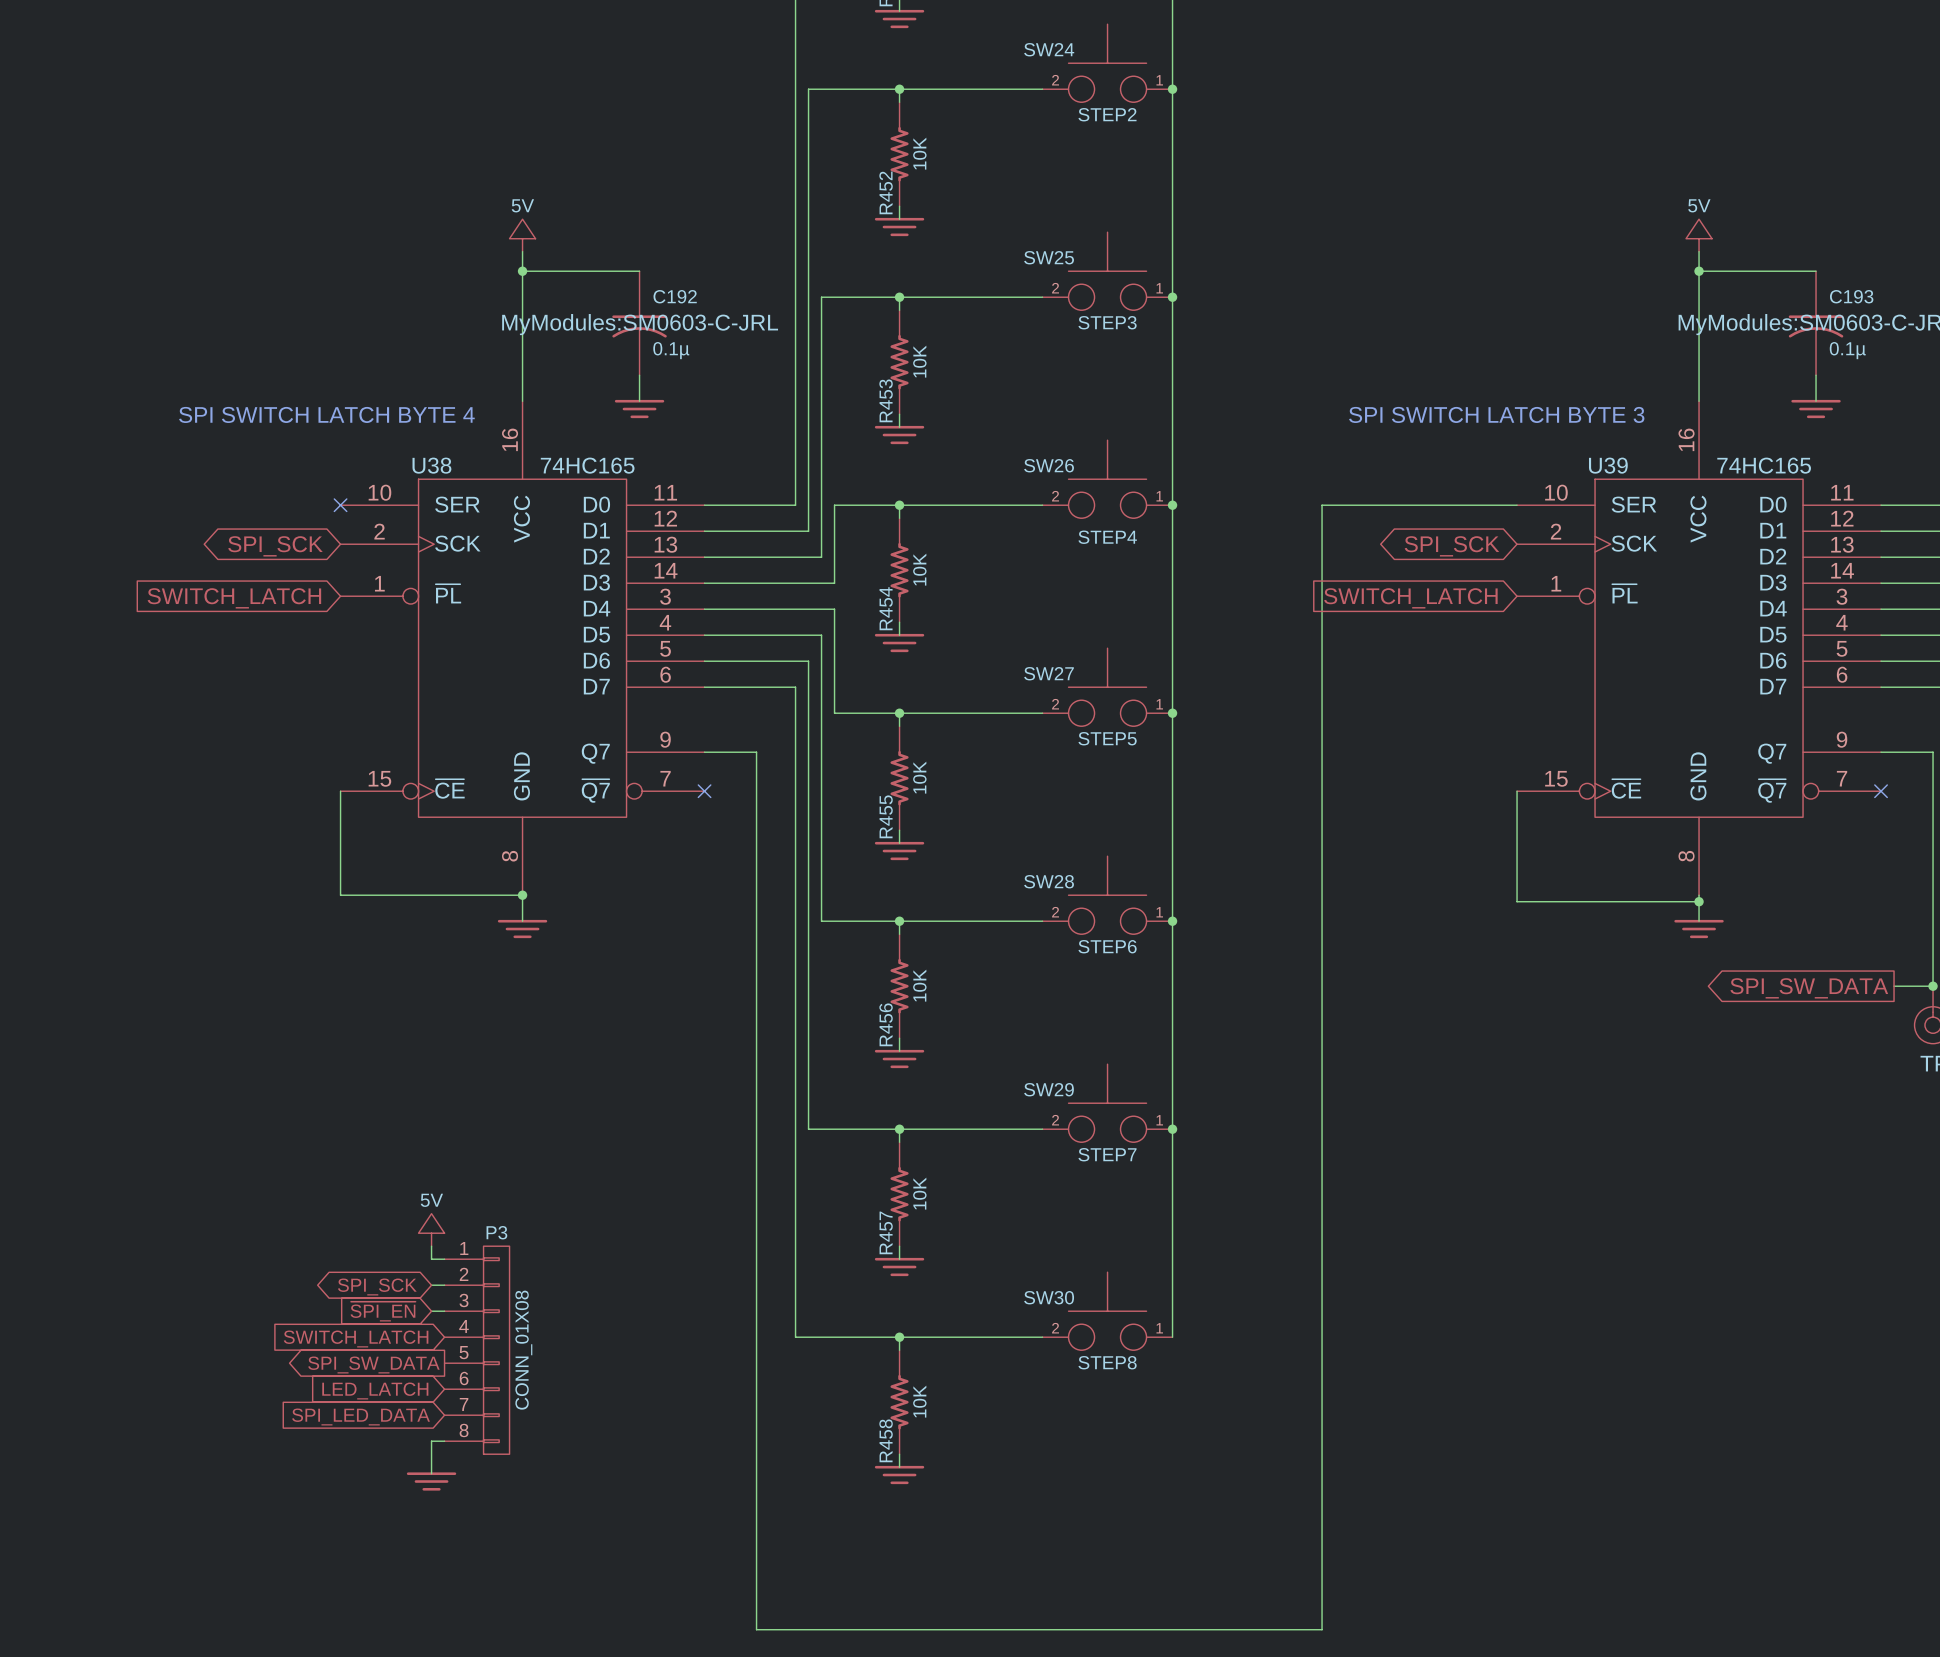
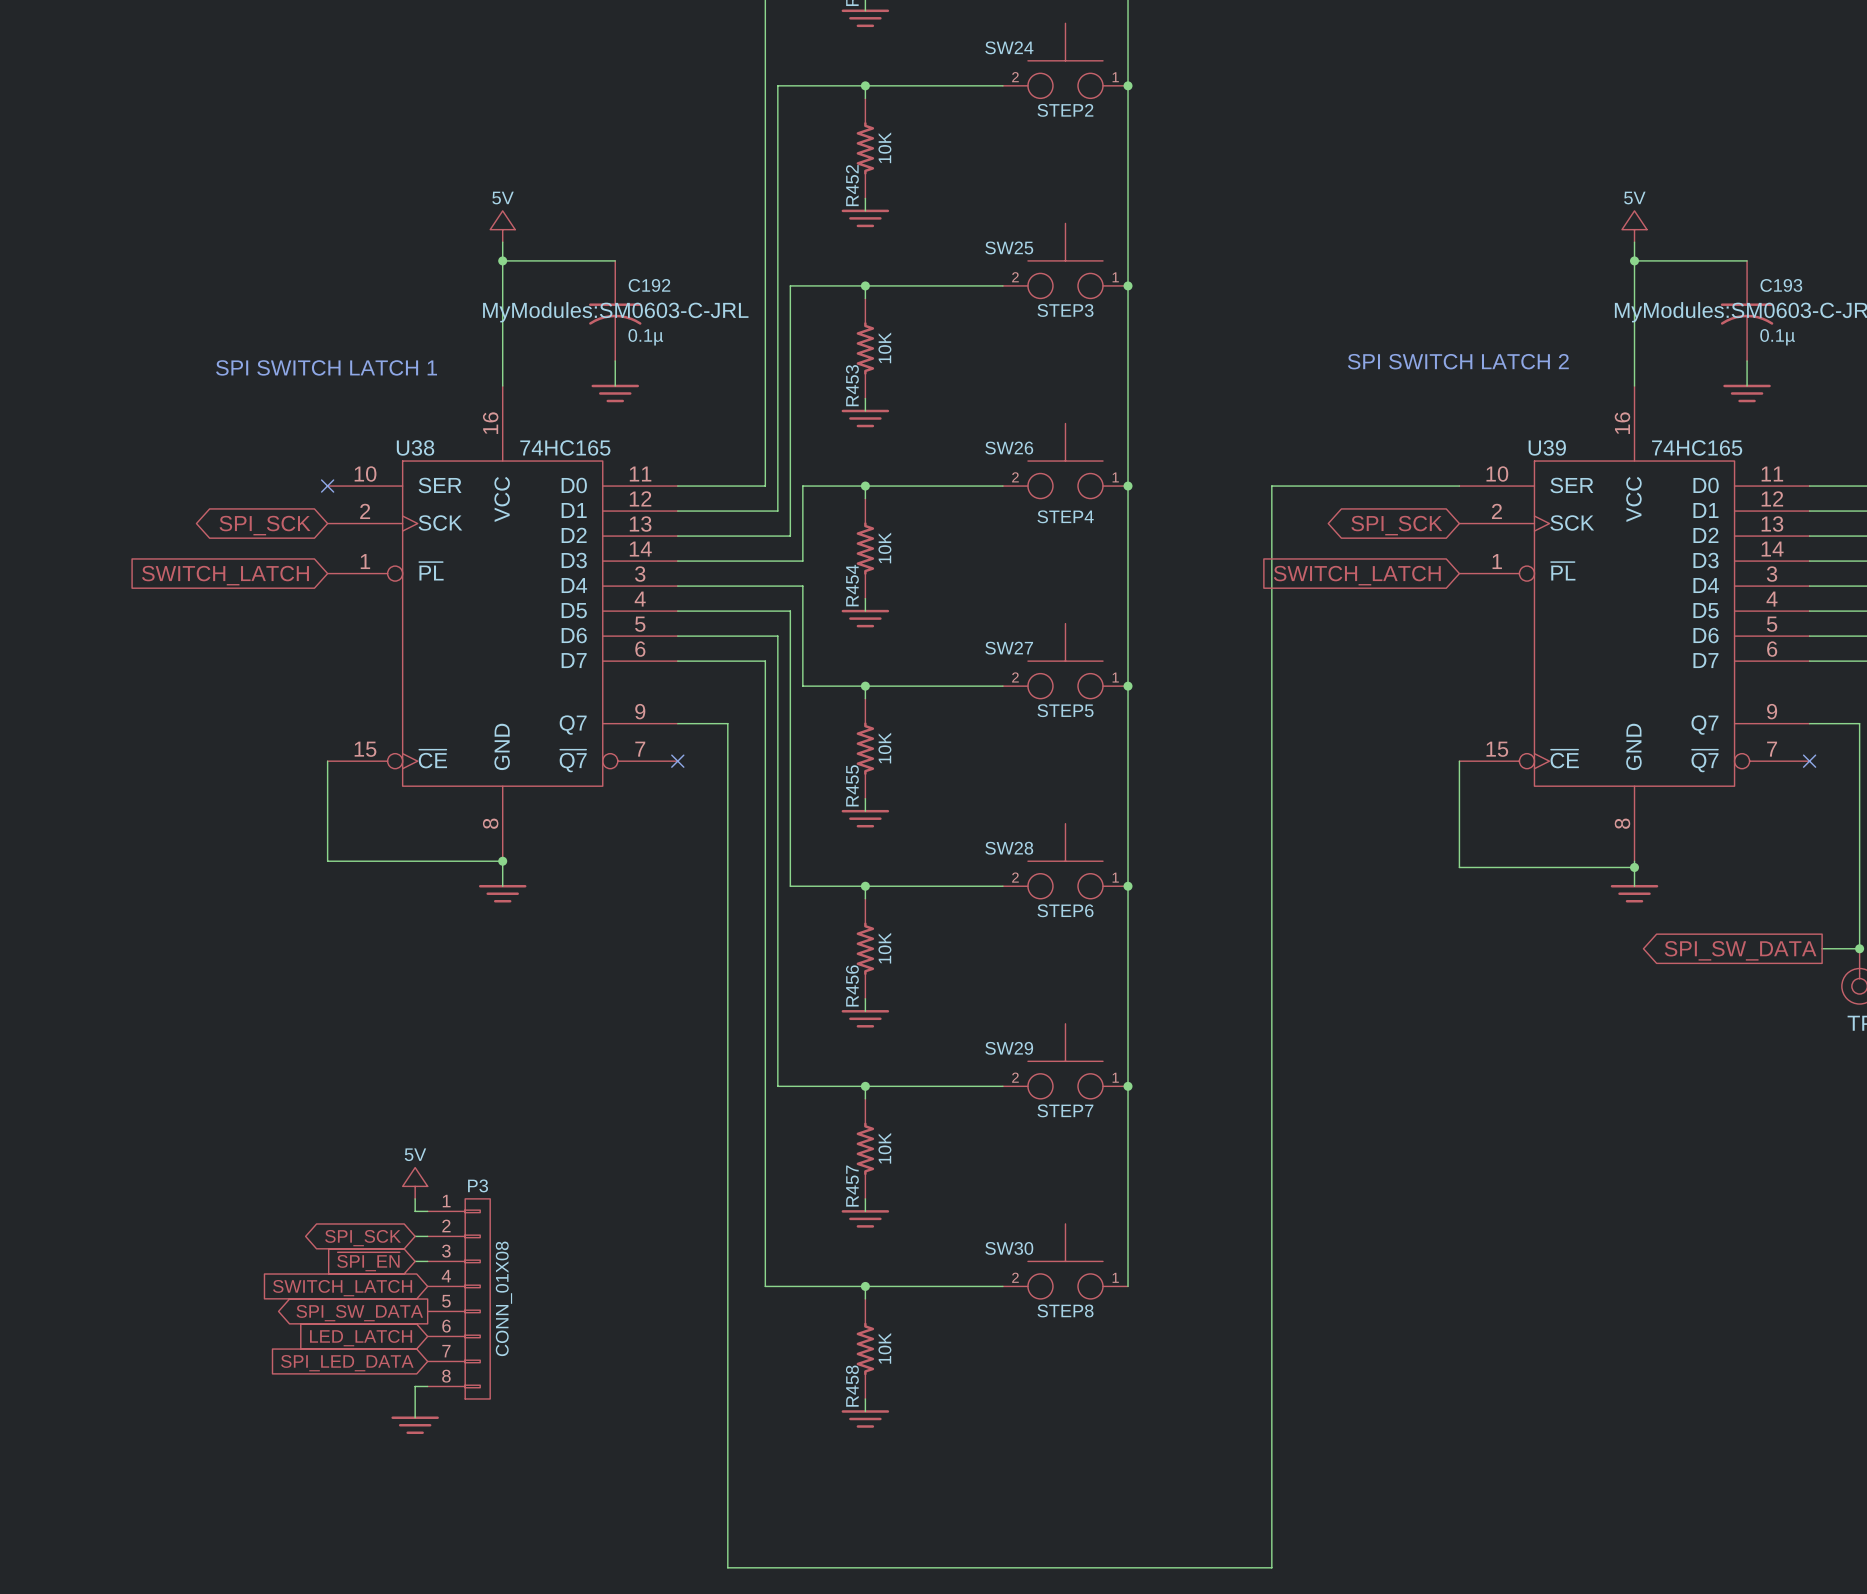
text: none -> SPI SWITCH LATCH 2 (1458, 361)
text: SPI SWITCH LATCH BYTE 4 (326, 414) -> SPI SWITCH LATCH 1 (326, 367)
text: SPI SWITCH LATCH BYTE 3 (1496, 414) -> none

